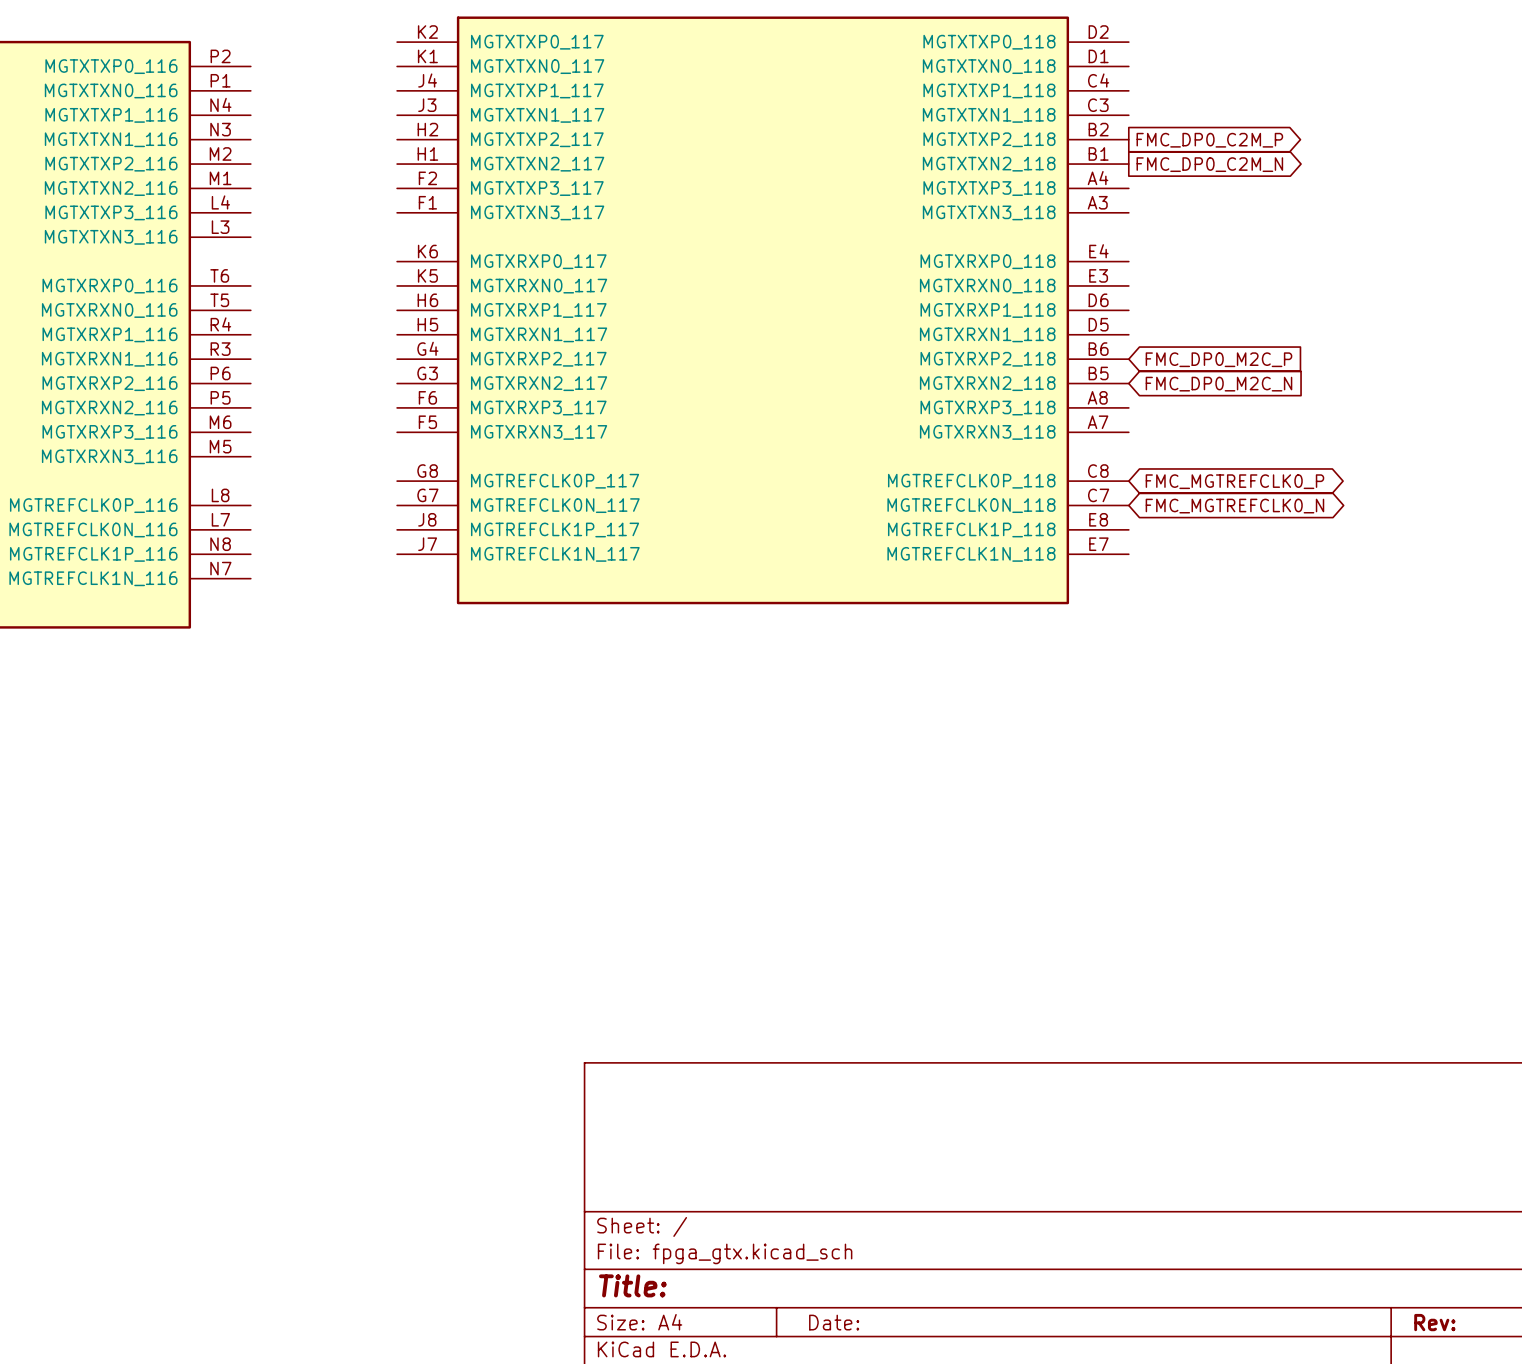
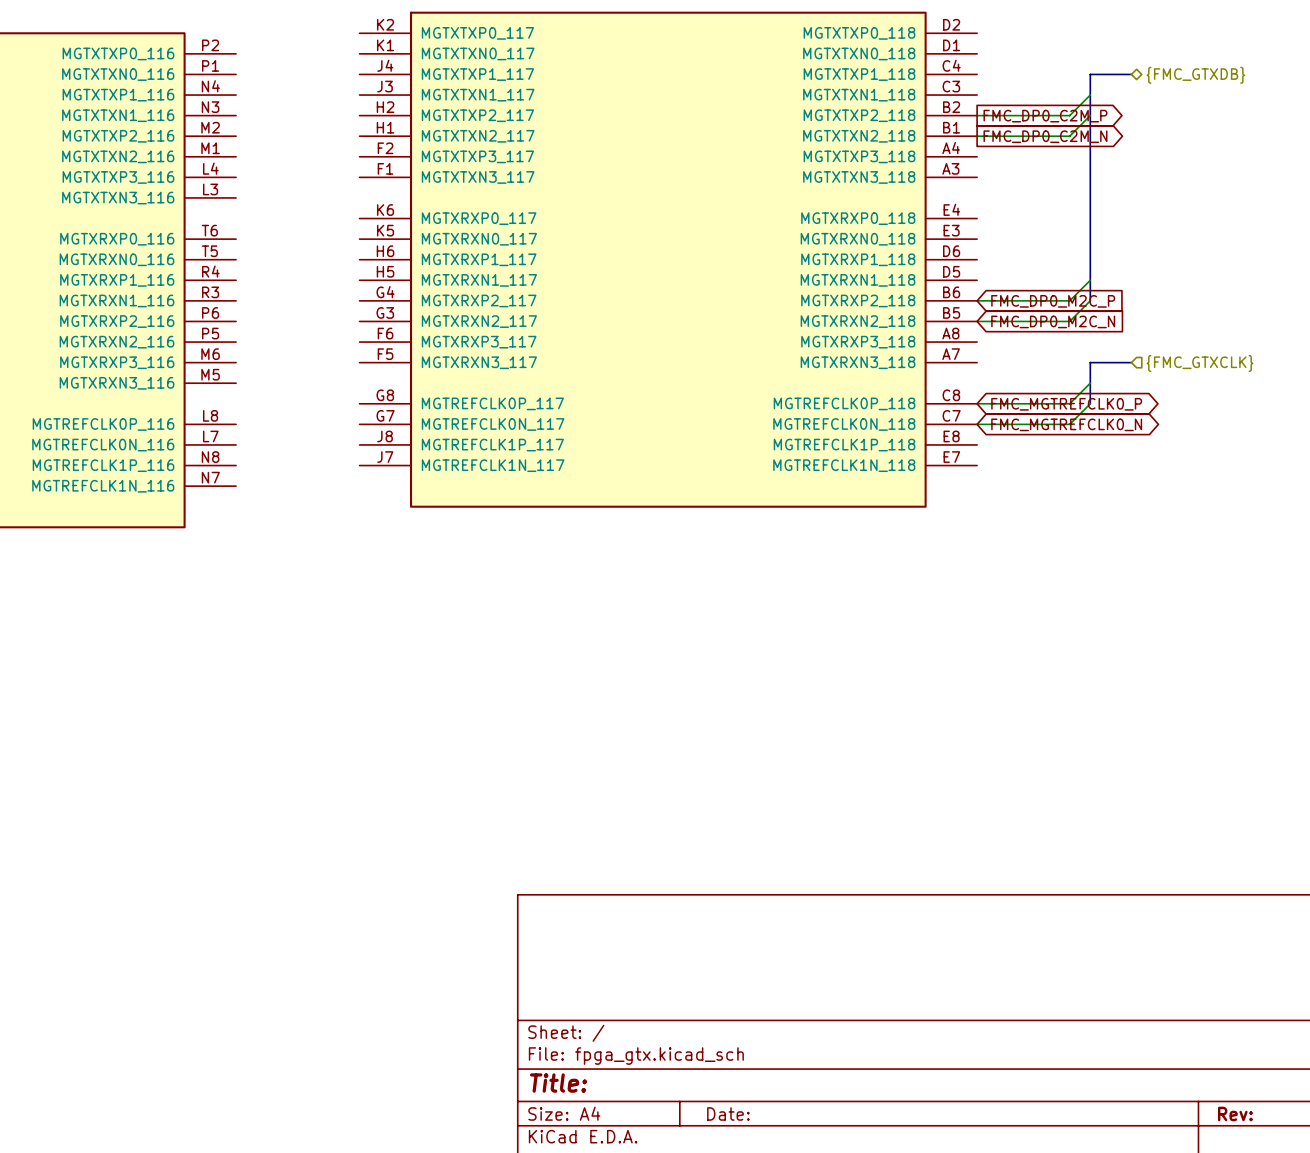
bus: none -> (1131, 74) (1090, 74) (1090, 300)
hierarchical label: none -> {FMC_GTXDB} (1195, 75)
wire: none -> (1090, 95) (1069, 115) (977, 115)
wire: none -> (1090, 115) (1069, 136) (977, 136)
wire: none -> (1090, 280) (1069, 300) (977, 300)
wire: none -> (1090, 300) (1069, 321) (977, 321)
bus: none -> (1131, 362) (1090, 362) (1090, 403)
hierarchical label: none -> {FMC_GTXCLK} (1200, 363)
wire: none -> (1090, 383) (1069, 403) (977, 403)
wire: none -> (1090, 403) (1069, 424) (977, 424)

